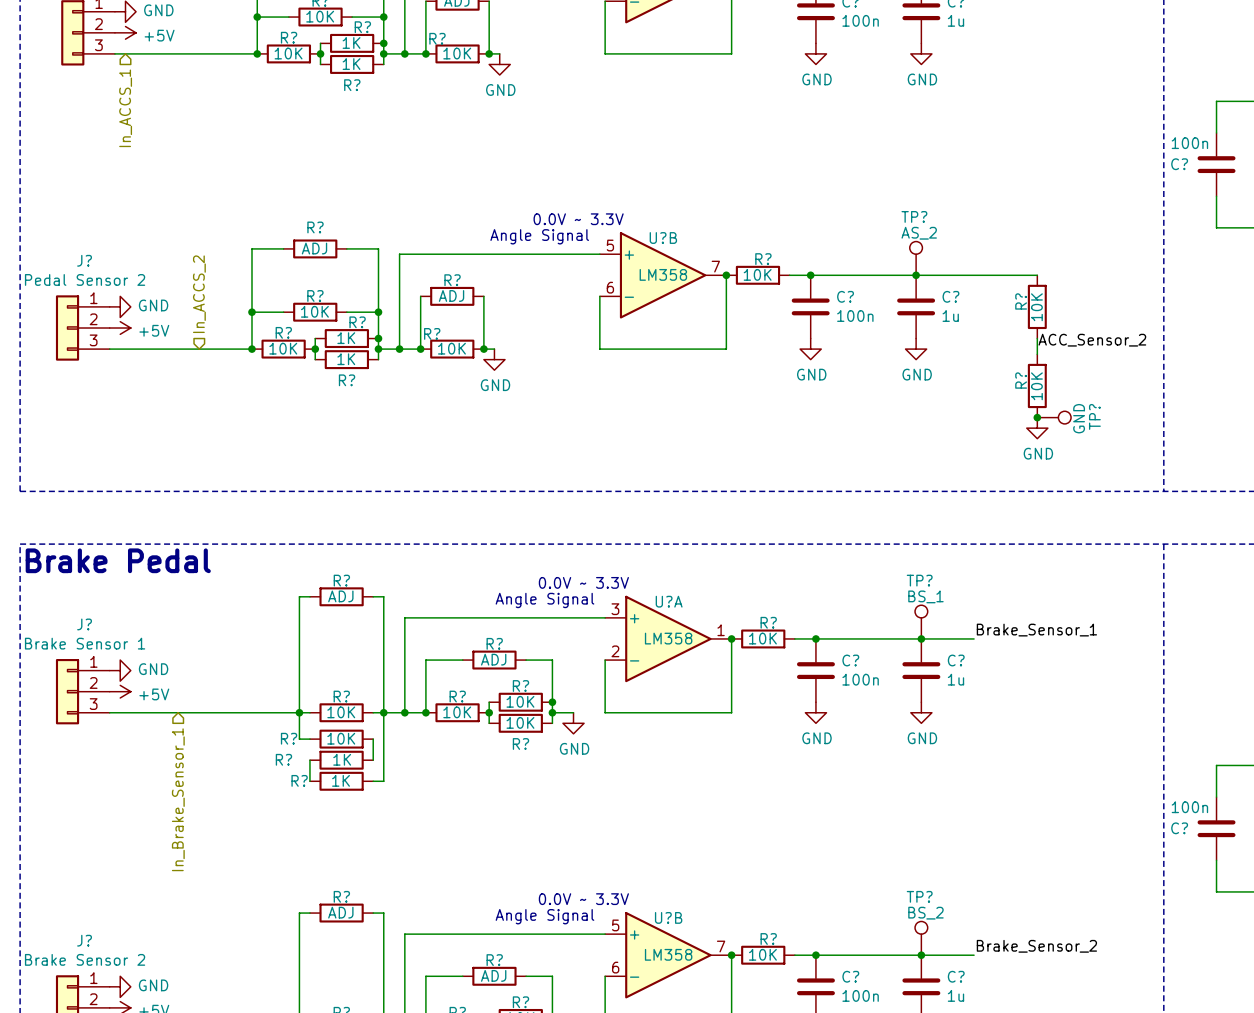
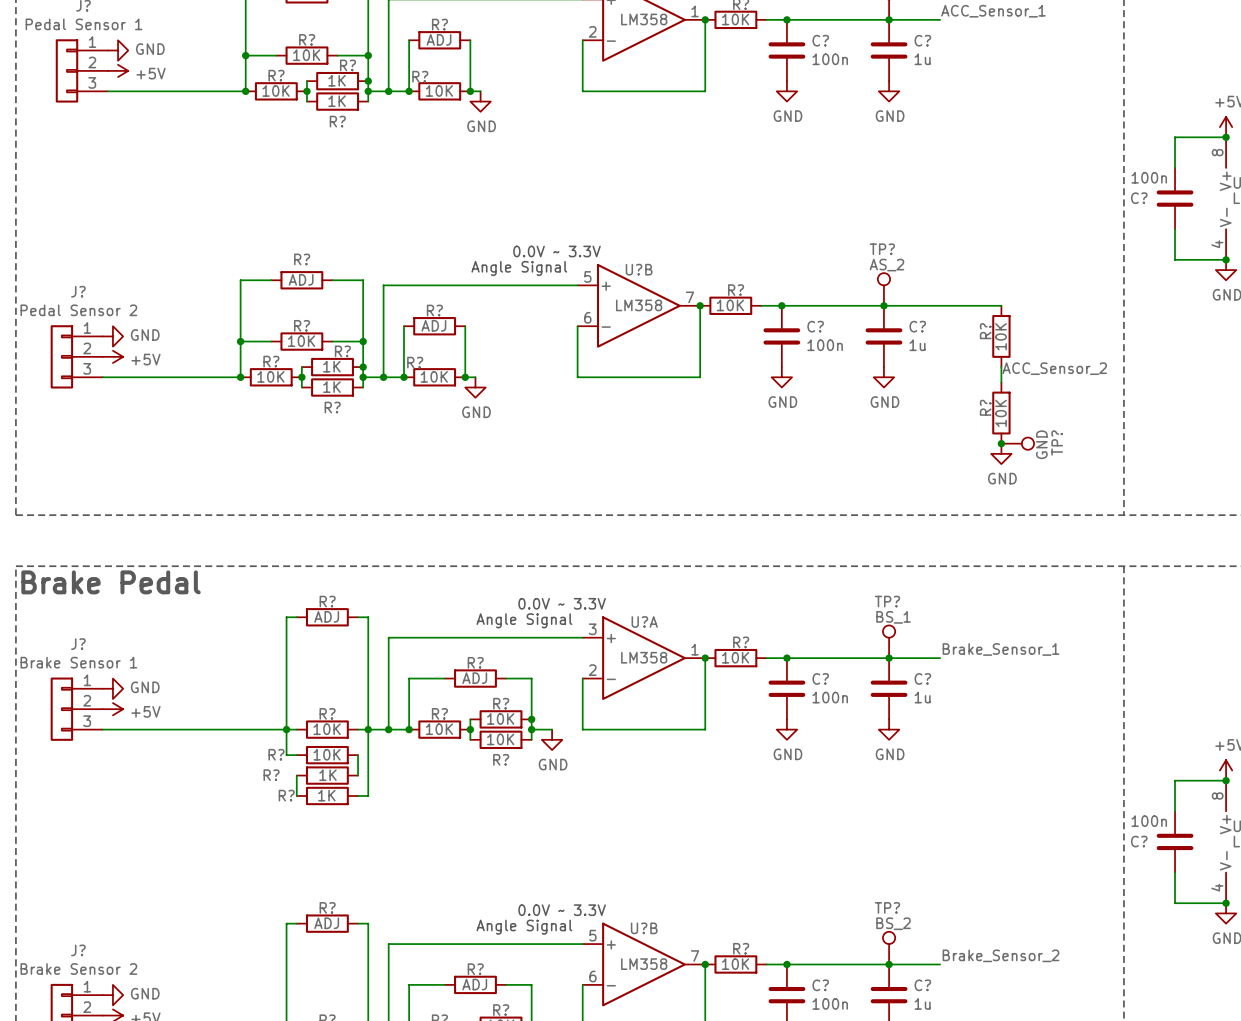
hierarchical label: In_ACCS_1 (125, 108) -> none
hierarchical label: In_ACCS_2 (199, 294) -> none
hierarchical label: In_Brake_Sensor_1 (178, 799) -> none

